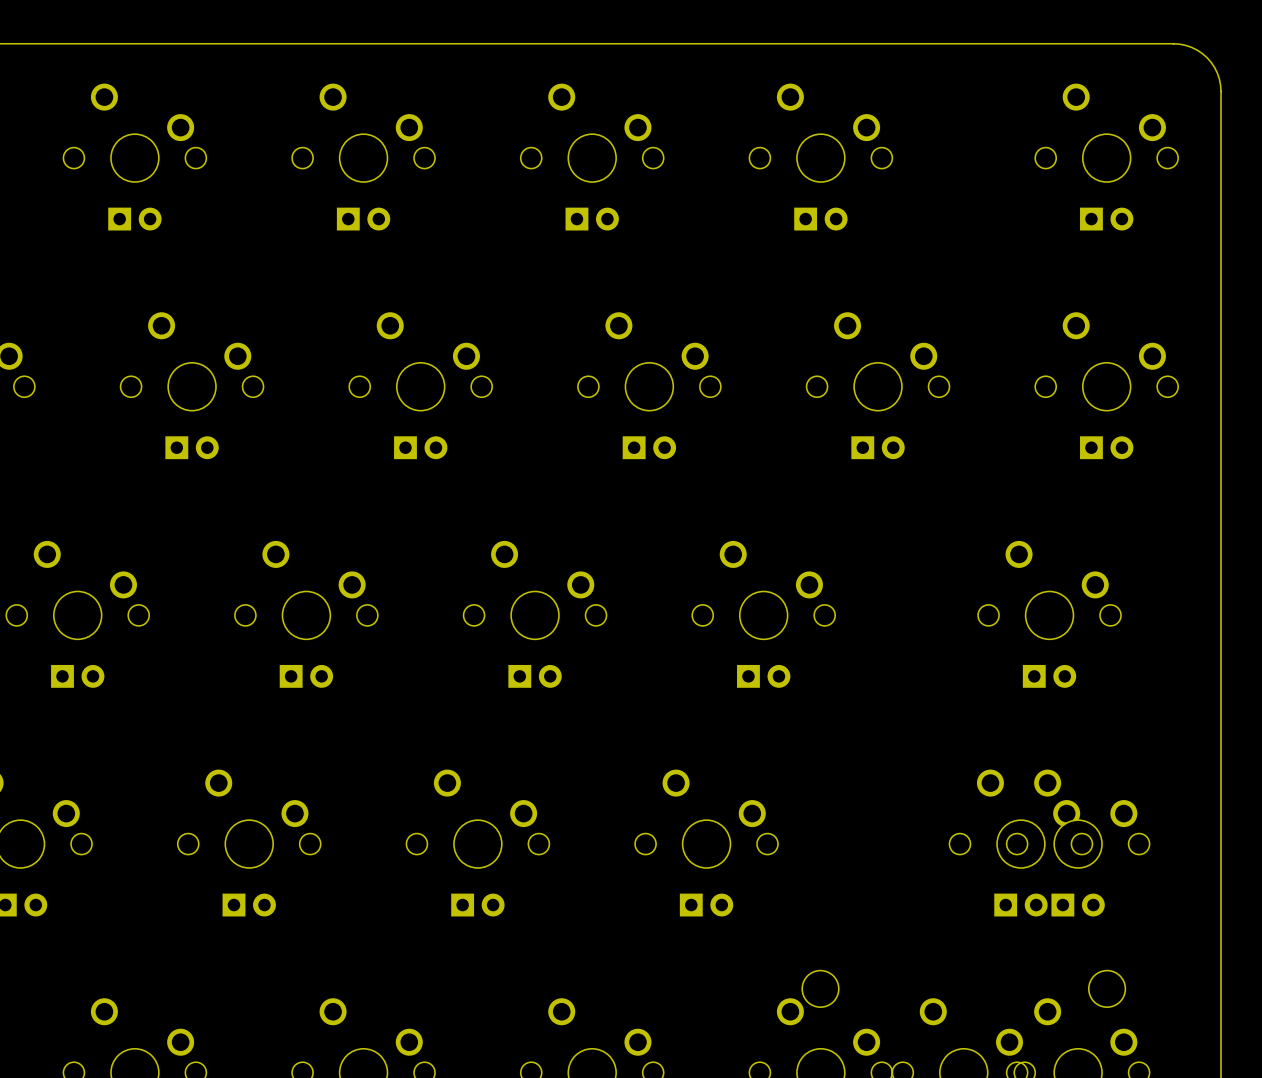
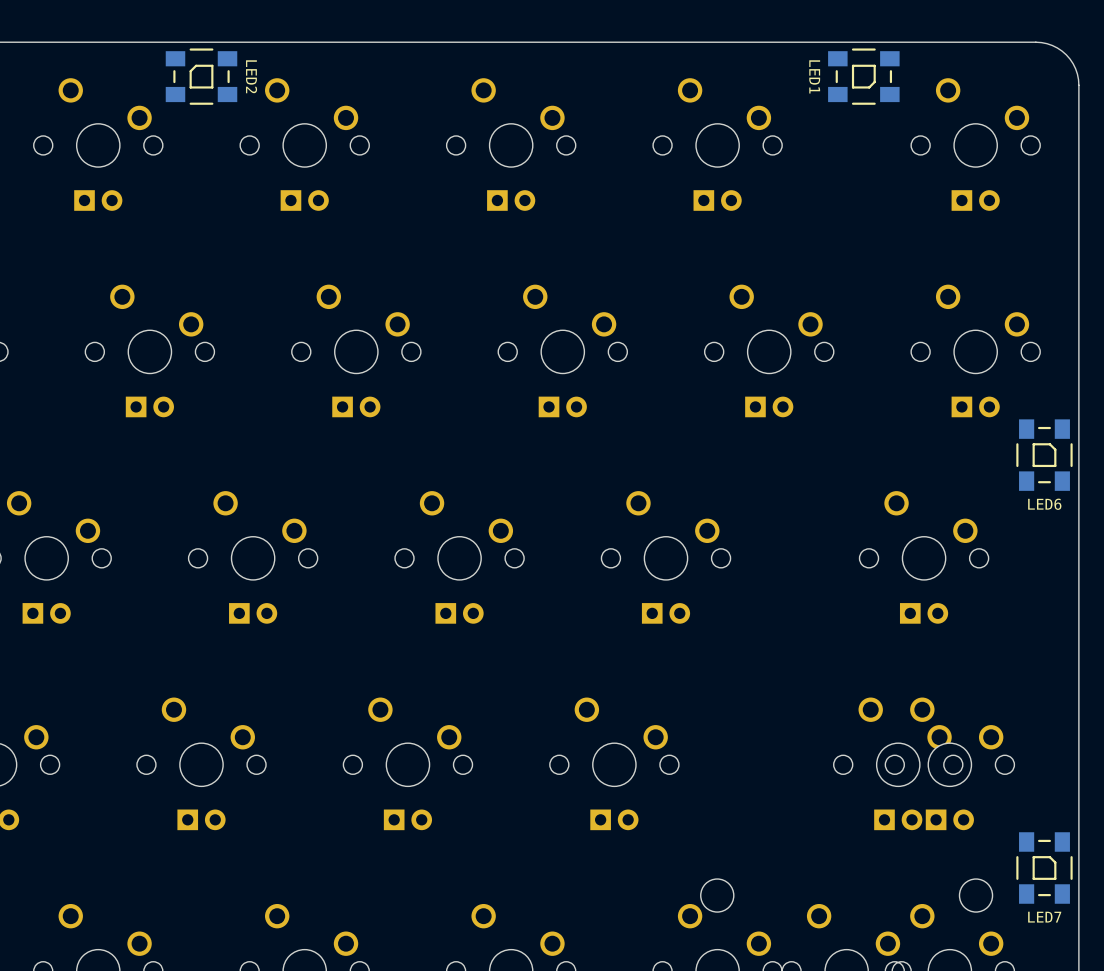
LED2: none -> (201, 76)
LED1: none -> (863, 76)
LED6: none -> (1044, 455)
LED7: none -> (1044, 868)

